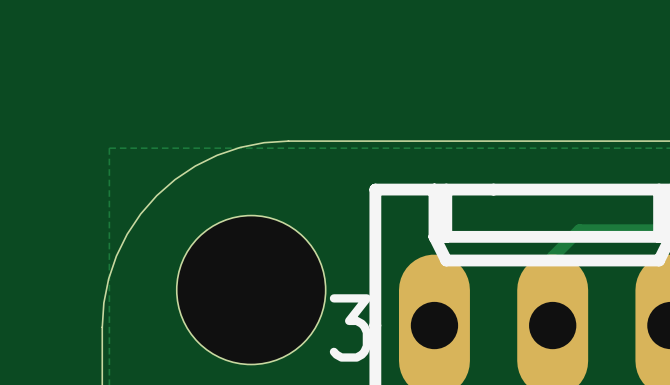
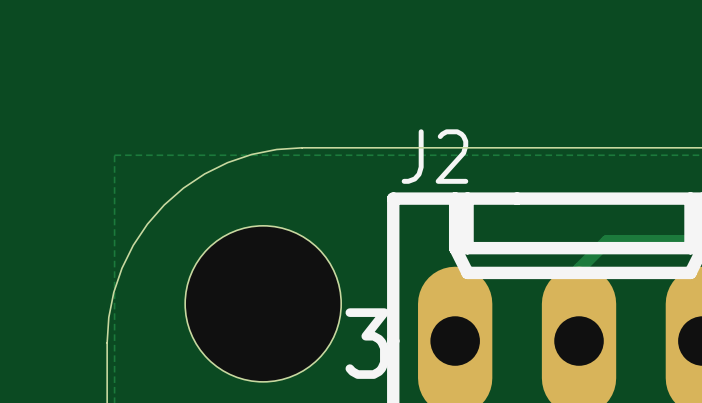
J2 name: none -> J2 (434, 156)

